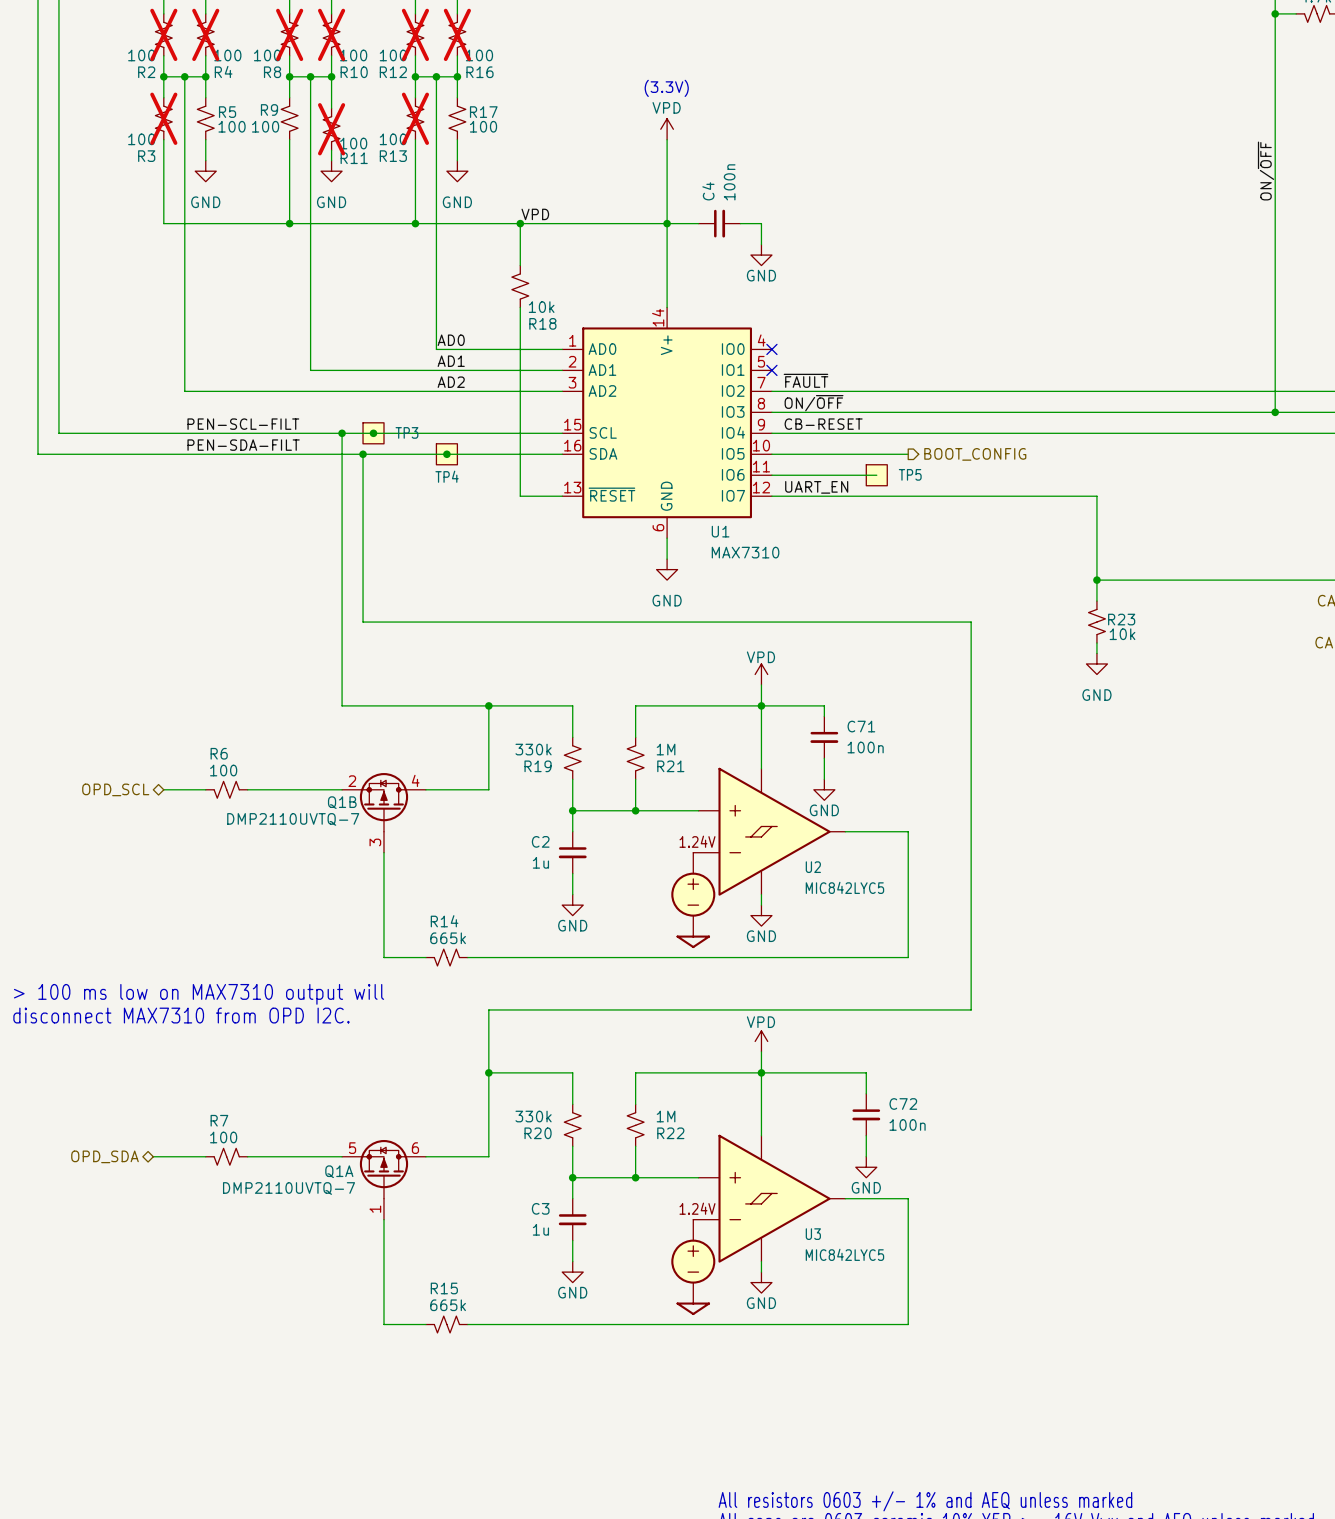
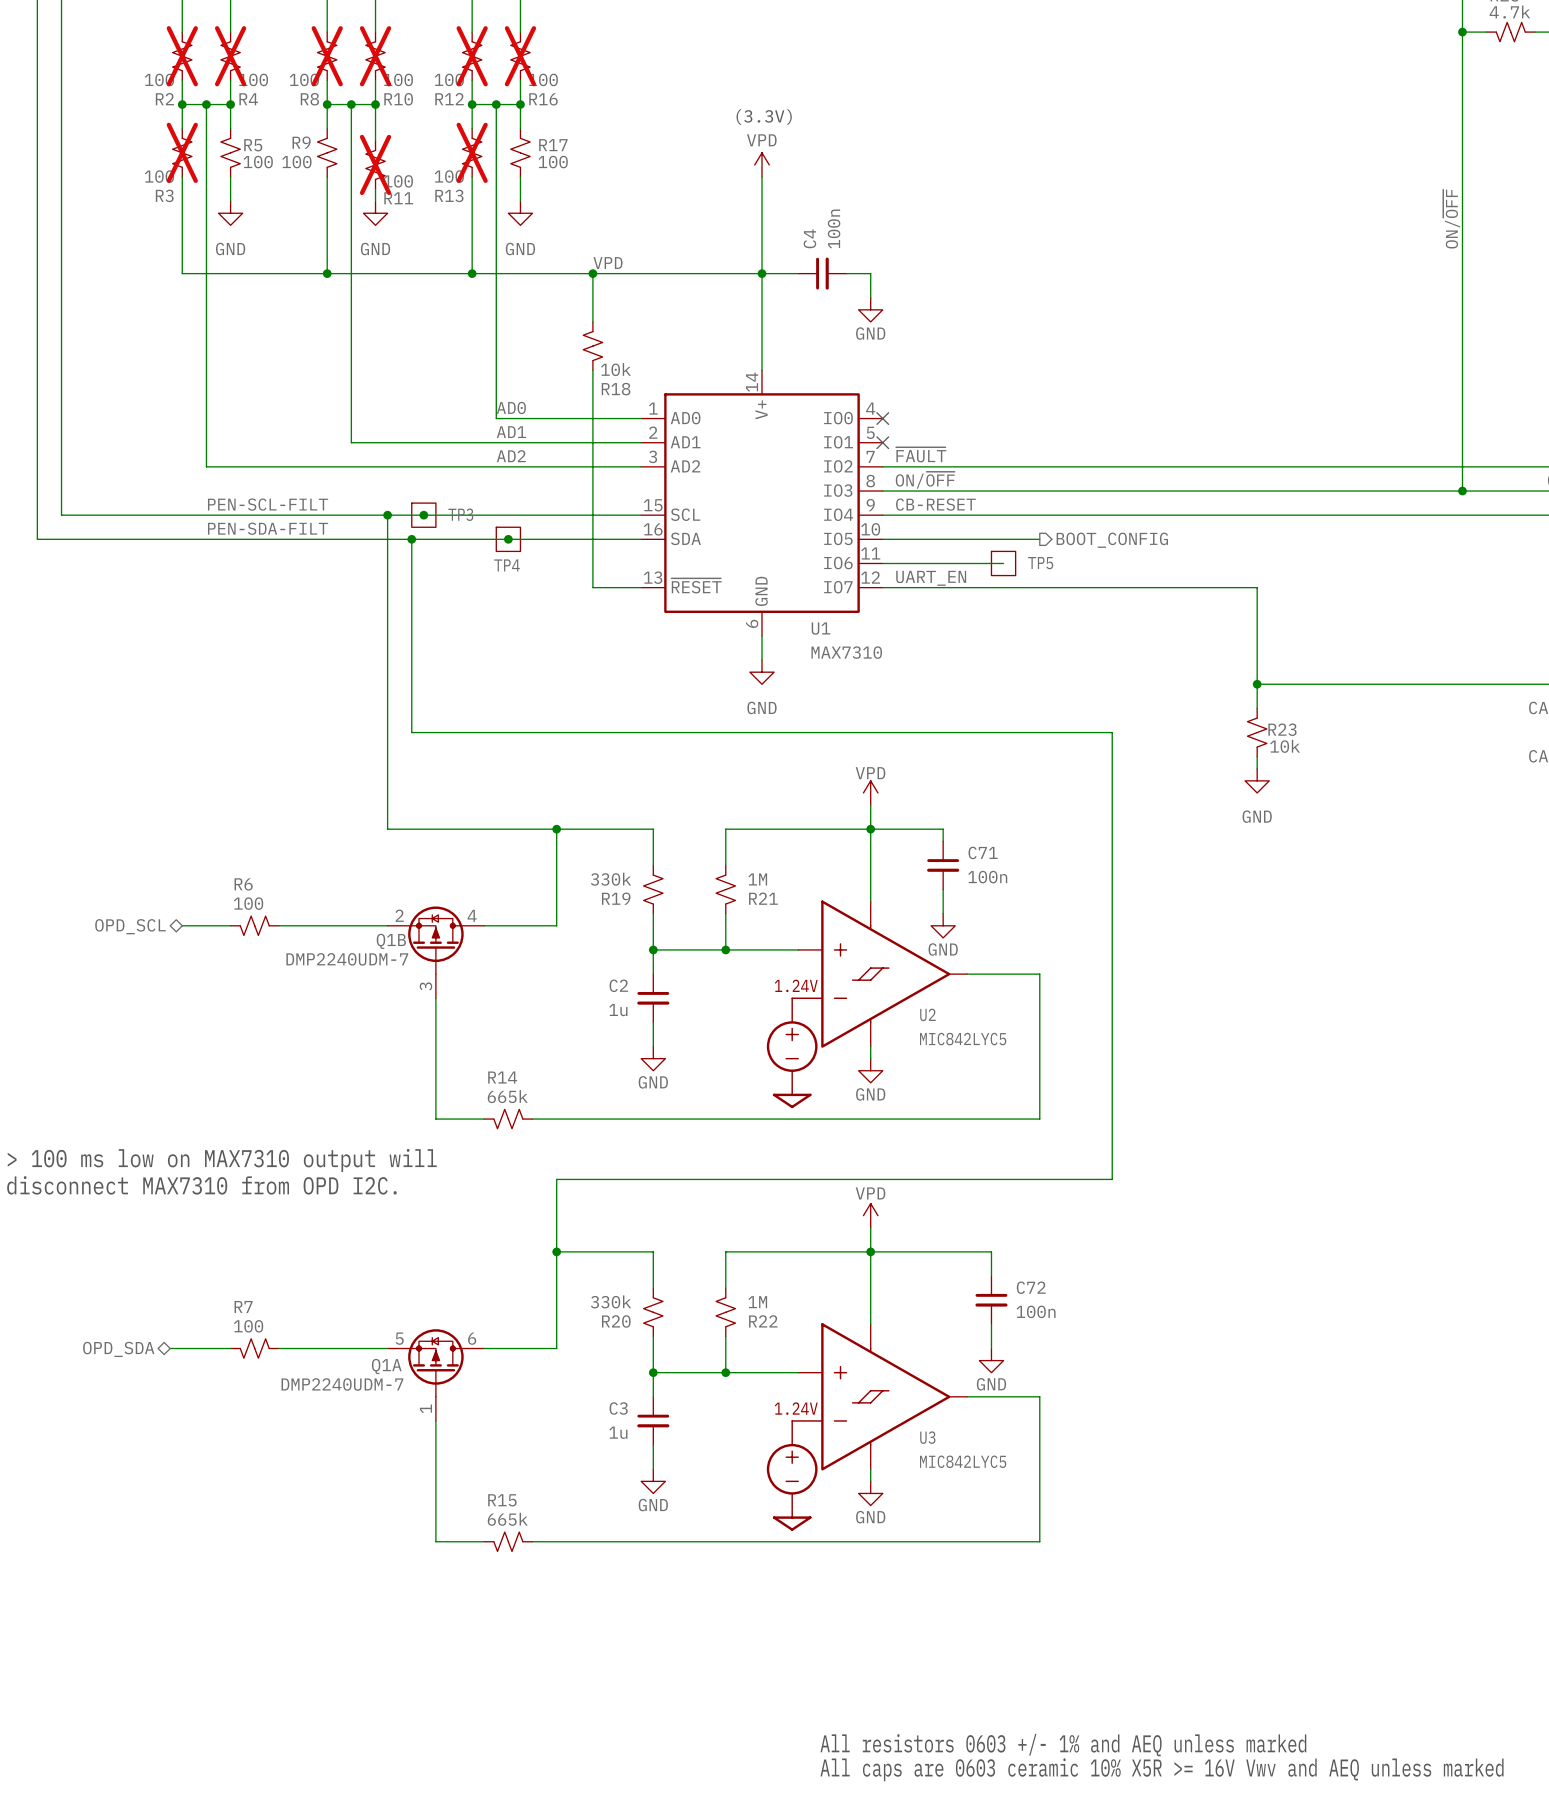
Q1B value: DMP2110UVTQ-7 (293, 819) -> DMP2240UDM-7 (347, 959)
Q1A value: DMP2110UVTQ-7 (289, 1188) -> DMP2240UDM-7 (342, 1384)

